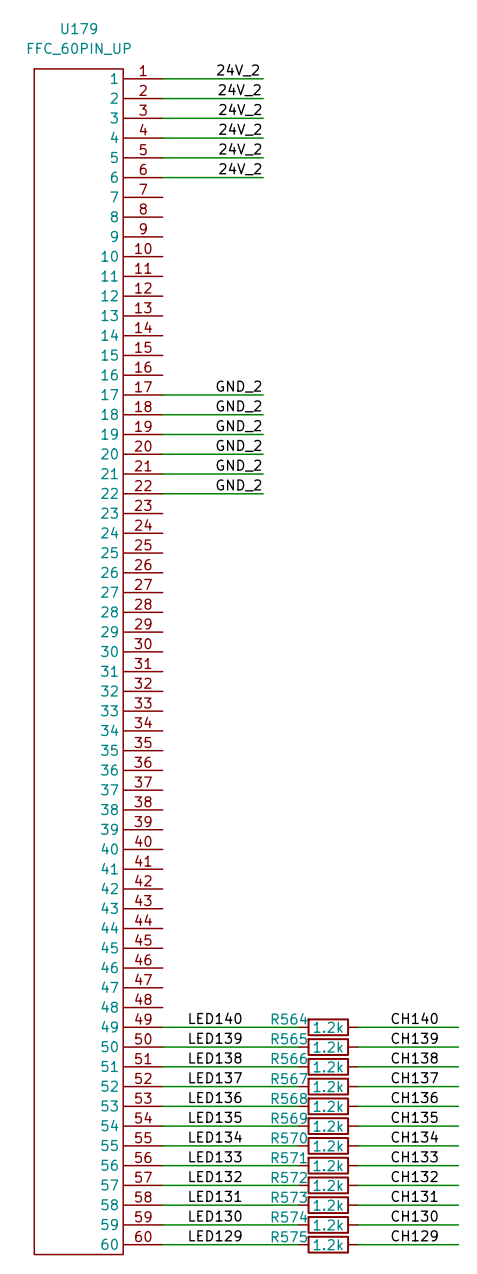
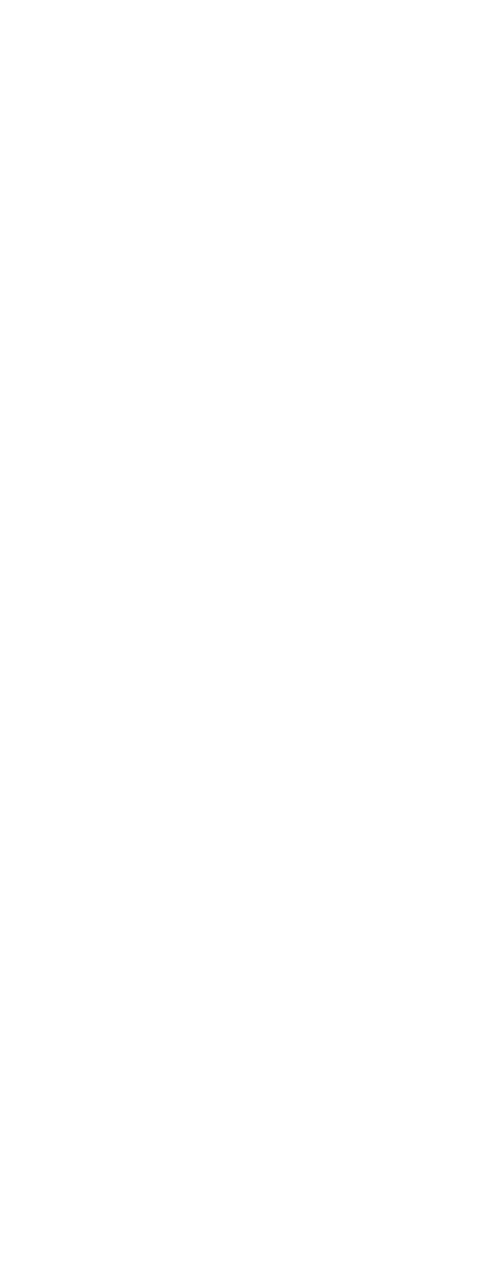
label: 24V_2 (237, 70) -> none
wire: (162, 78) (263, 78) -> none
label: 24V_2 (239, 89) -> none
wire: (162, 98) (263, 98) -> none
label: 24V_2 (240, 109) -> none
wire: (162, 118) (263, 118) -> none
label: 24V_2 (240, 129) -> none
wire: (162, 138) (263, 138) -> none
label: 24V_2 (240, 149) -> none
wire: (162, 157) (263, 157) -> none
label: 24V_2 (240, 169) -> none
wire: (162, 177) (263, 177) -> none
label: GND_2 (238, 386) -> none
wire: (162, 394) (263, 394) -> none
label: GND_2 (238, 406) -> none
wire: (162, 414) (263, 414) -> none
label: GND_2 (238, 426) -> none
wire: (162, 434) (263, 434) -> none
label: GND_2 (238, 445) -> none
wire: (162, 454) (263, 454) -> none
label: GND_2 (238, 465) -> none
wire: (162, 474) (263, 474) -> none
label: GND_2 (238, 485) -> none
wire: (162, 493) (263, 493) -> none
U179: FFC_60PIN_UP (98, 661) -> none
label: LED140 (215, 1018) -> none
label: CH140 (414, 1018) -> none
wire: (162, 1027) (298, 1027) -> none
R564: 1.2k (328, 1027) -> none
wire: (357, 1027) (458, 1027) -> none
label: LED139 (215, 1038) -> none
label: CH139 (414, 1038) -> none
wire: (162, 1047) (298, 1047) -> none
R565: 1.2k (328, 1047) -> none
wire: (357, 1047) (458, 1047) -> none
label: LED138 (215, 1058) -> none
label: CH138 (414, 1058) -> none
wire: (162, 1066) (298, 1066) -> none
R566: 1.2k (328, 1066) -> none
wire: (357, 1066) (458, 1066) -> none
label: LED137 (215, 1077) -> none
label: CH137 (414, 1077) -> none
wire: (162, 1086) (298, 1086) -> none
R567: 1.2k (328, 1086) -> none
wire: (357, 1086) (458, 1086) -> none
label: LED136 (215, 1097) -> none
label: CH136 (414, 1097) -> none
wire: (162, 1106) (298, 1106) -> none
R568: 1.2k (328, 1106) -> none
wire: (357, 1106) (458, 1106) -> none
label: LED135 (215, 1117) -> none
label: CH135 (414, 1117) -> none
wire: (162, 1126) (298, 1126) -> none
R569: 1.2k (328, 1126) -> none
wire: (357, 1126) (458, 1126) -> none
label: LED134 (215, 1136) -> none
label: CH134 (414, 1136) -> none
wire: (162, 1145) (298, 1145) -> none
R570: 1.2k (328, 1145) -> none
wire: (357, 1145) (458, 1145) -> none
label: LED133 (215, 1156) -> none
label: CH133 (414, 1156) -> none
wire: (162, 1165) (298, 1165) -> none
R571: 1.2k (328, 1165) -> none
wire: (357, 1165) (458, 1165) -> none
label: LED132 (215, 1176) -> none
label: CH132 (414, 1176) -> none
wire: (162, 1185) (298, 1185) -> none
R572: 1.2k (328, 1185) -> none
wire: (357, 1185) (458, 1185) -> none
label: LED131 (215, 1196) -> none
label: CH131 (414, 1196) -> none
wire: (162, 1205) (298, 1205) -> none
R573: 1.2k (328, 1205) -> none
wire: (357, 1205) (458, 1205) -> none
label: LED130 (215, 1216) -> none
label: CH130 (414, 1216) -> none
wire: (162, 1224) (298, 1224) -> none
R574: 1.2k (328, 1224) -> none
wire: (357, 1224) (458, 1224) -> none
label: LED129 (215, 1235) -> none
label: CH129 (414, 1235) -> none
wire: (162, 1244) (298, 1244) -> none
R575: 1.2k (328, 1244) -> none
wire: (357, 1244) (458, 1244) -> none

